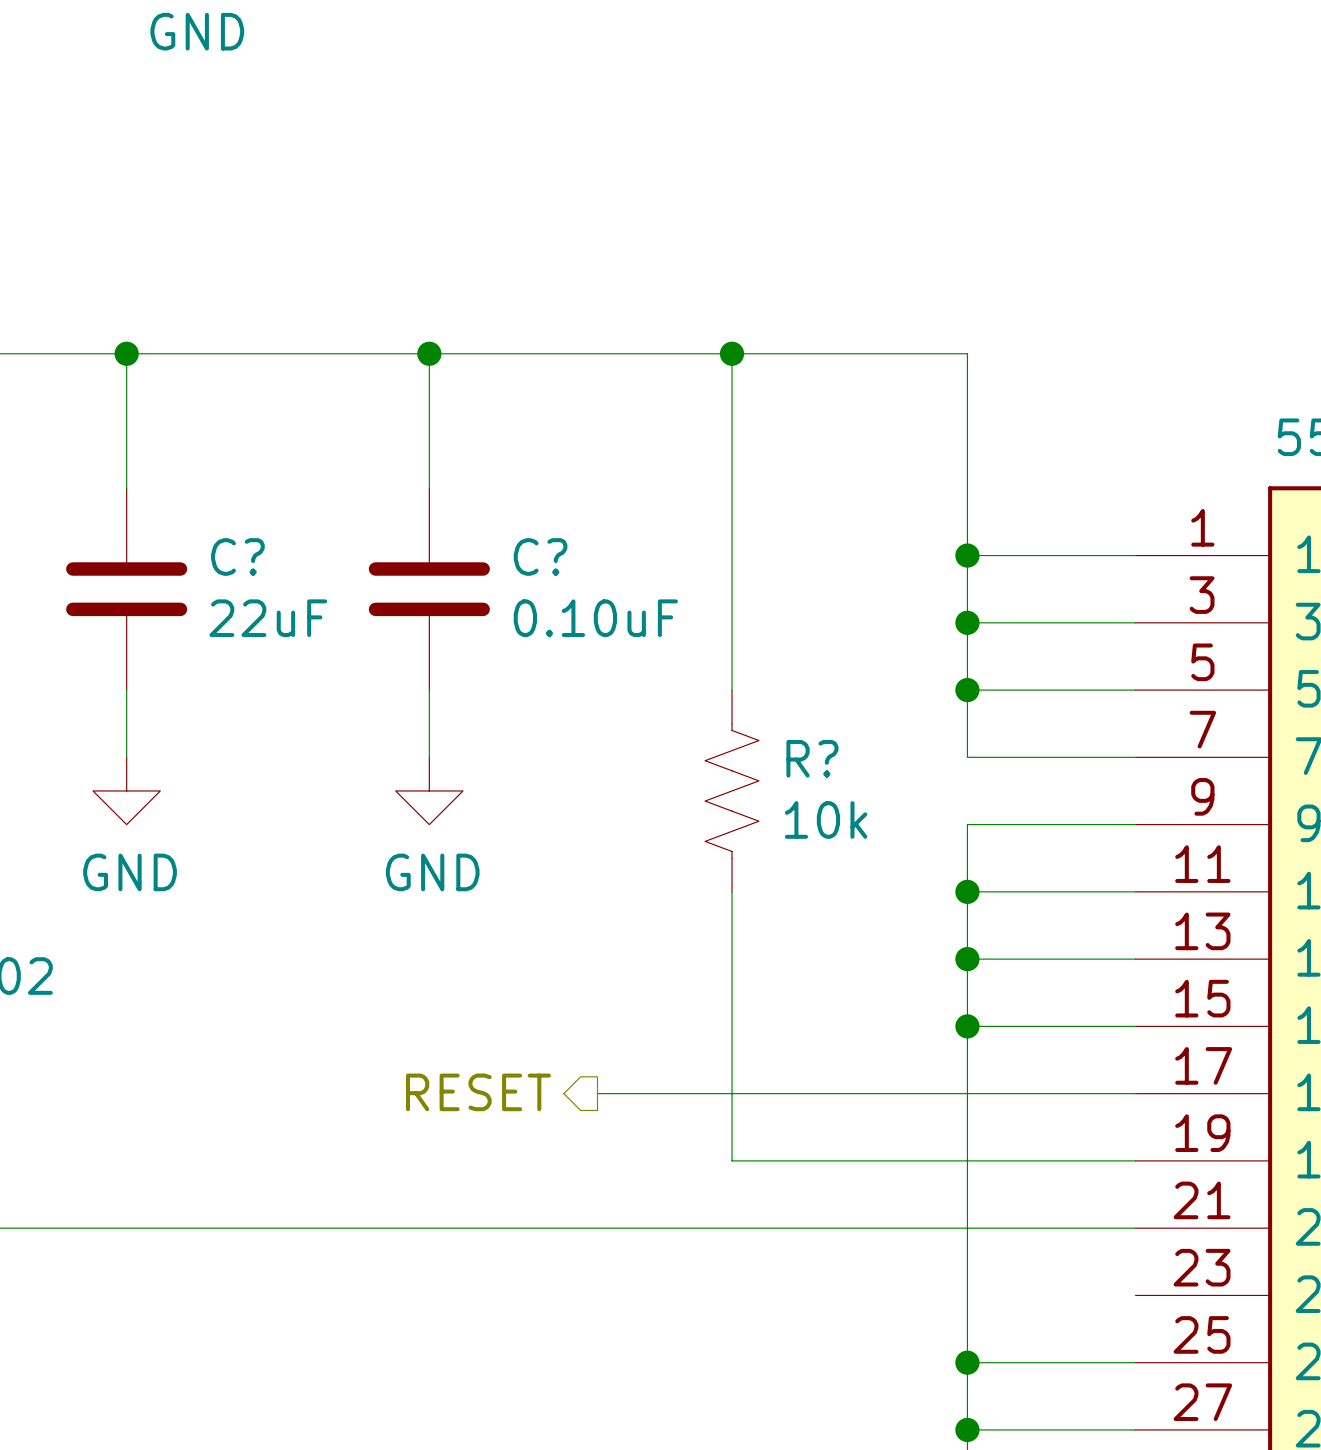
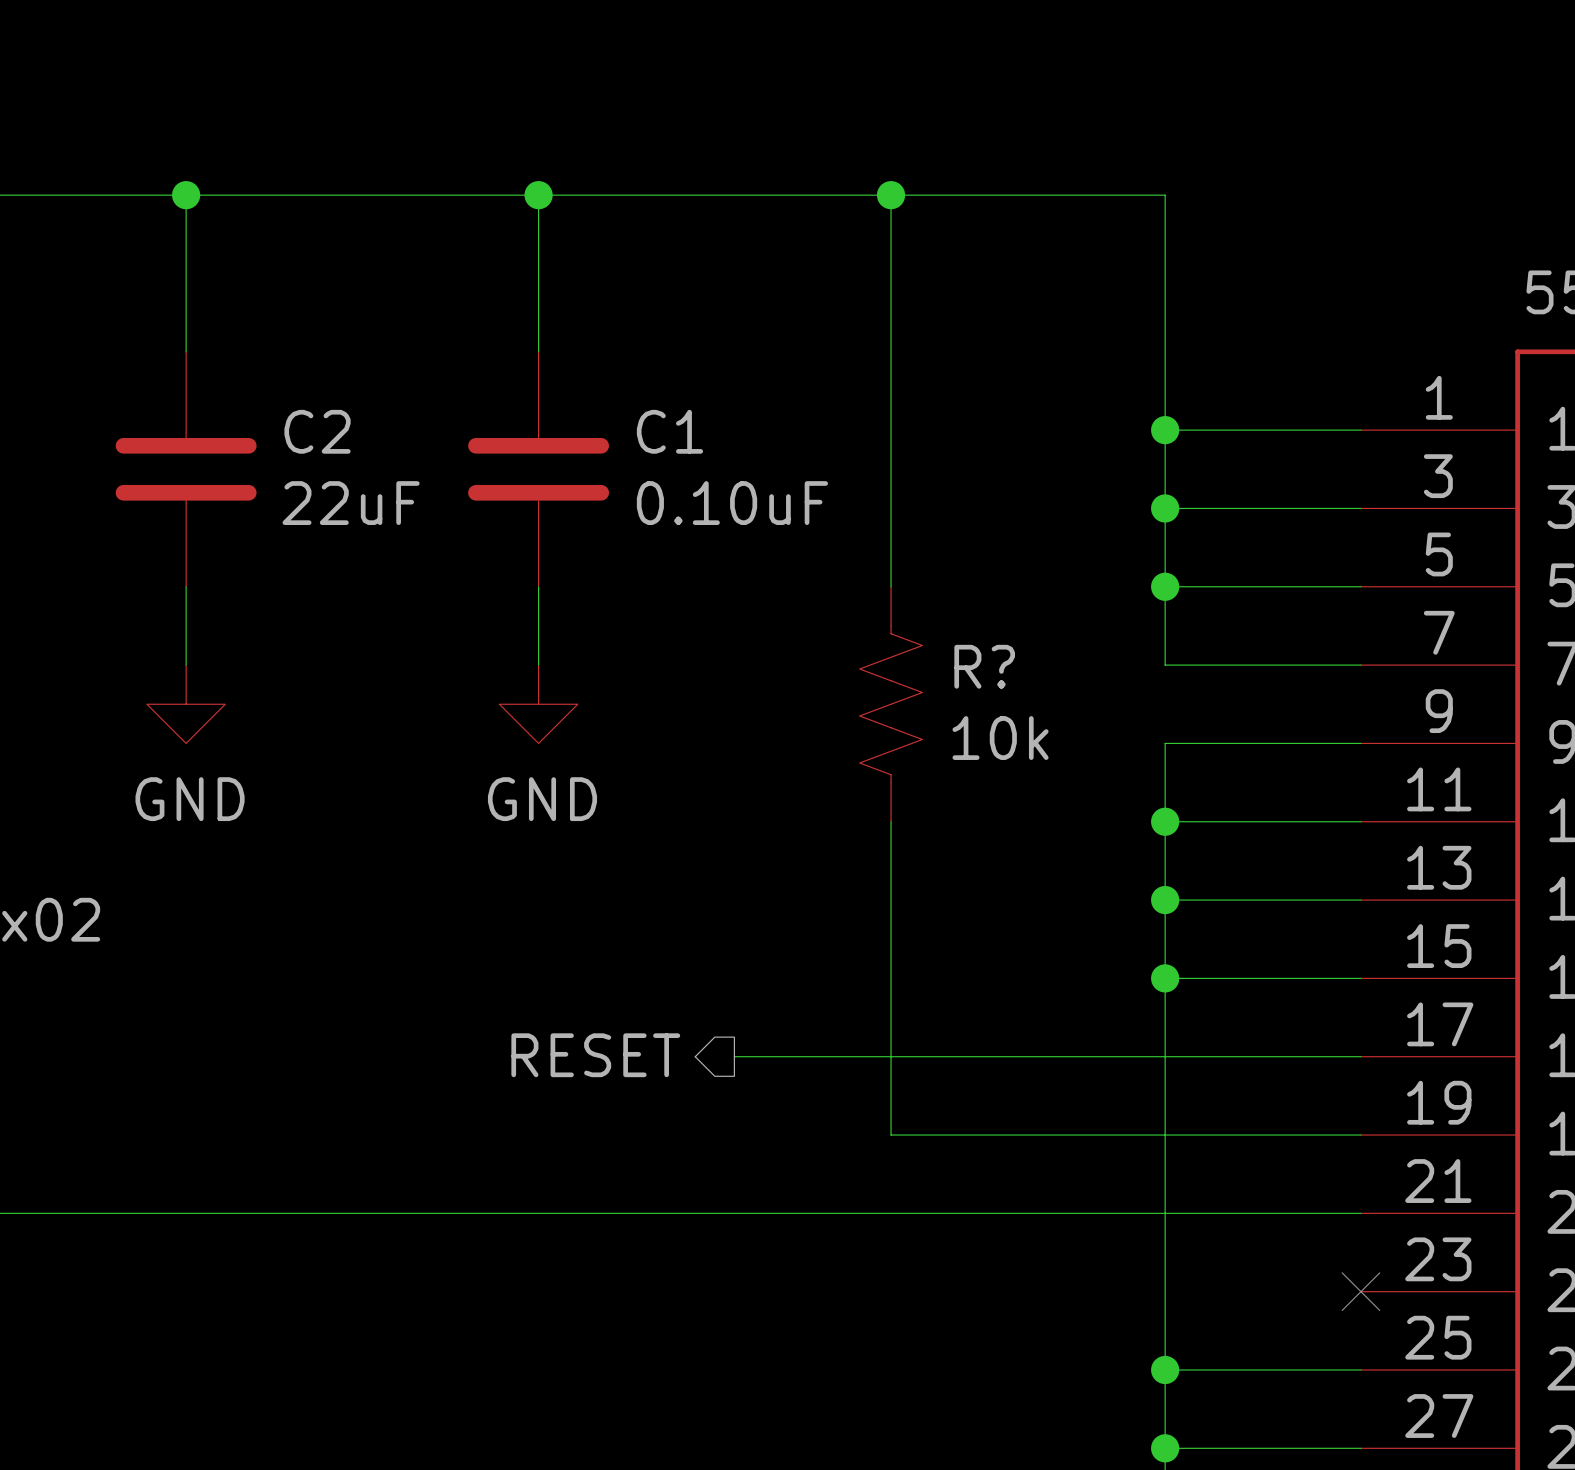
C? name: C? (237, 556) -> C2 (317, 431)
C? name: C? (540, 556) -> C1 (669, 431)
no-connect mark: none -> (1360, 1291)

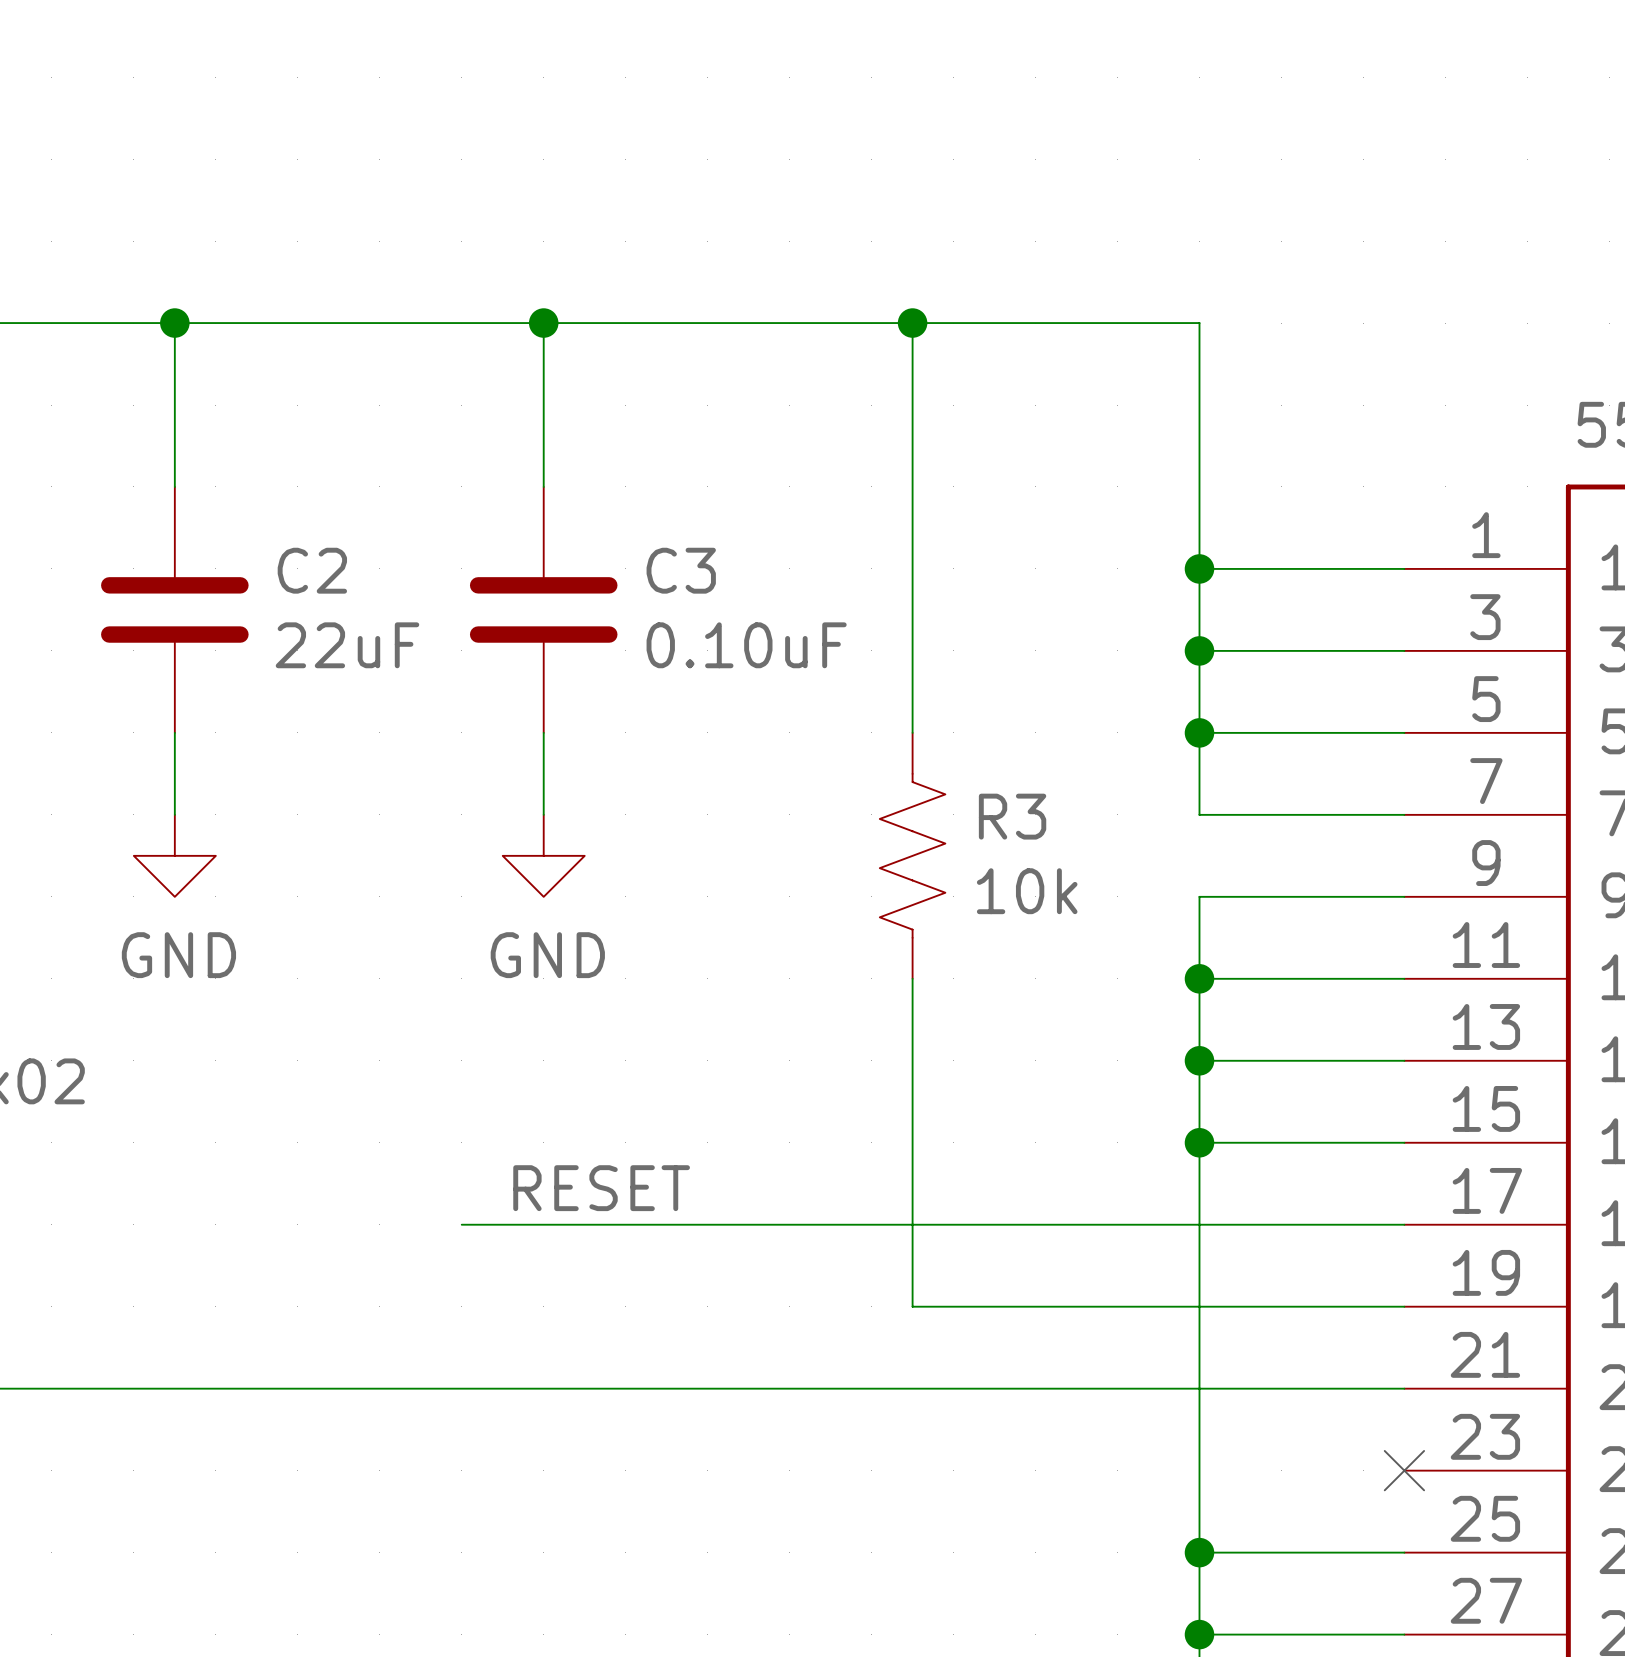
C1 name: C1 (669, 431) -> C3 (681, 570)
R? name: R? (984, 666) -> R3 (1012, 816)
label: none -> RESET (601, 1188)
hierarchical label: RESET (595, 1055) -> none
wire: none -> (461, 1224) (748, 1224)

